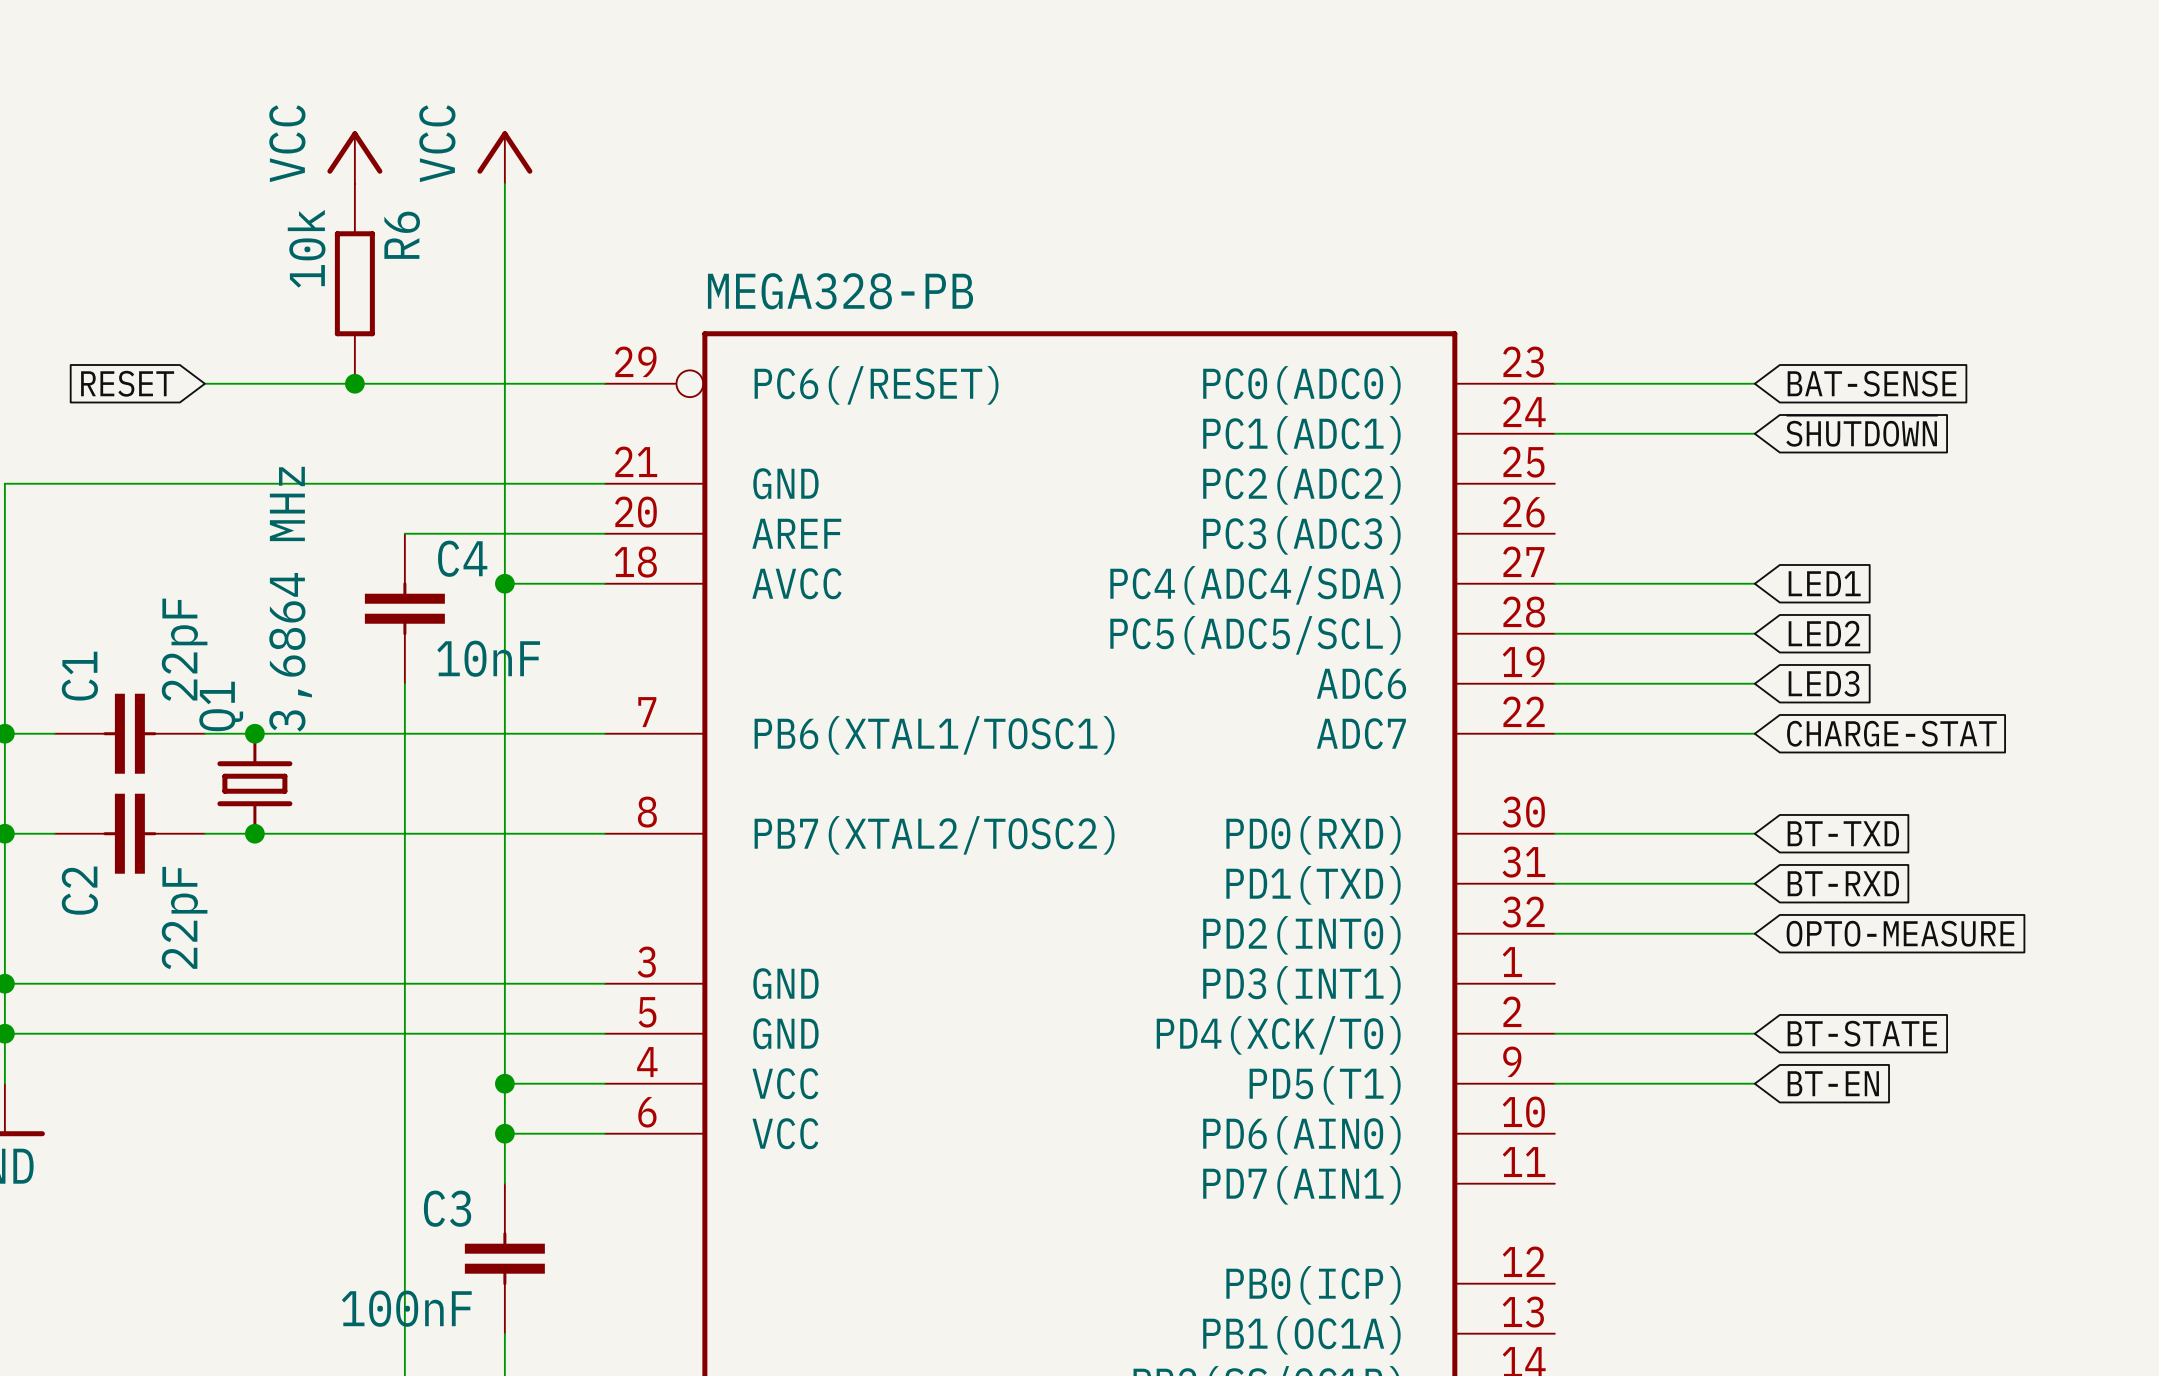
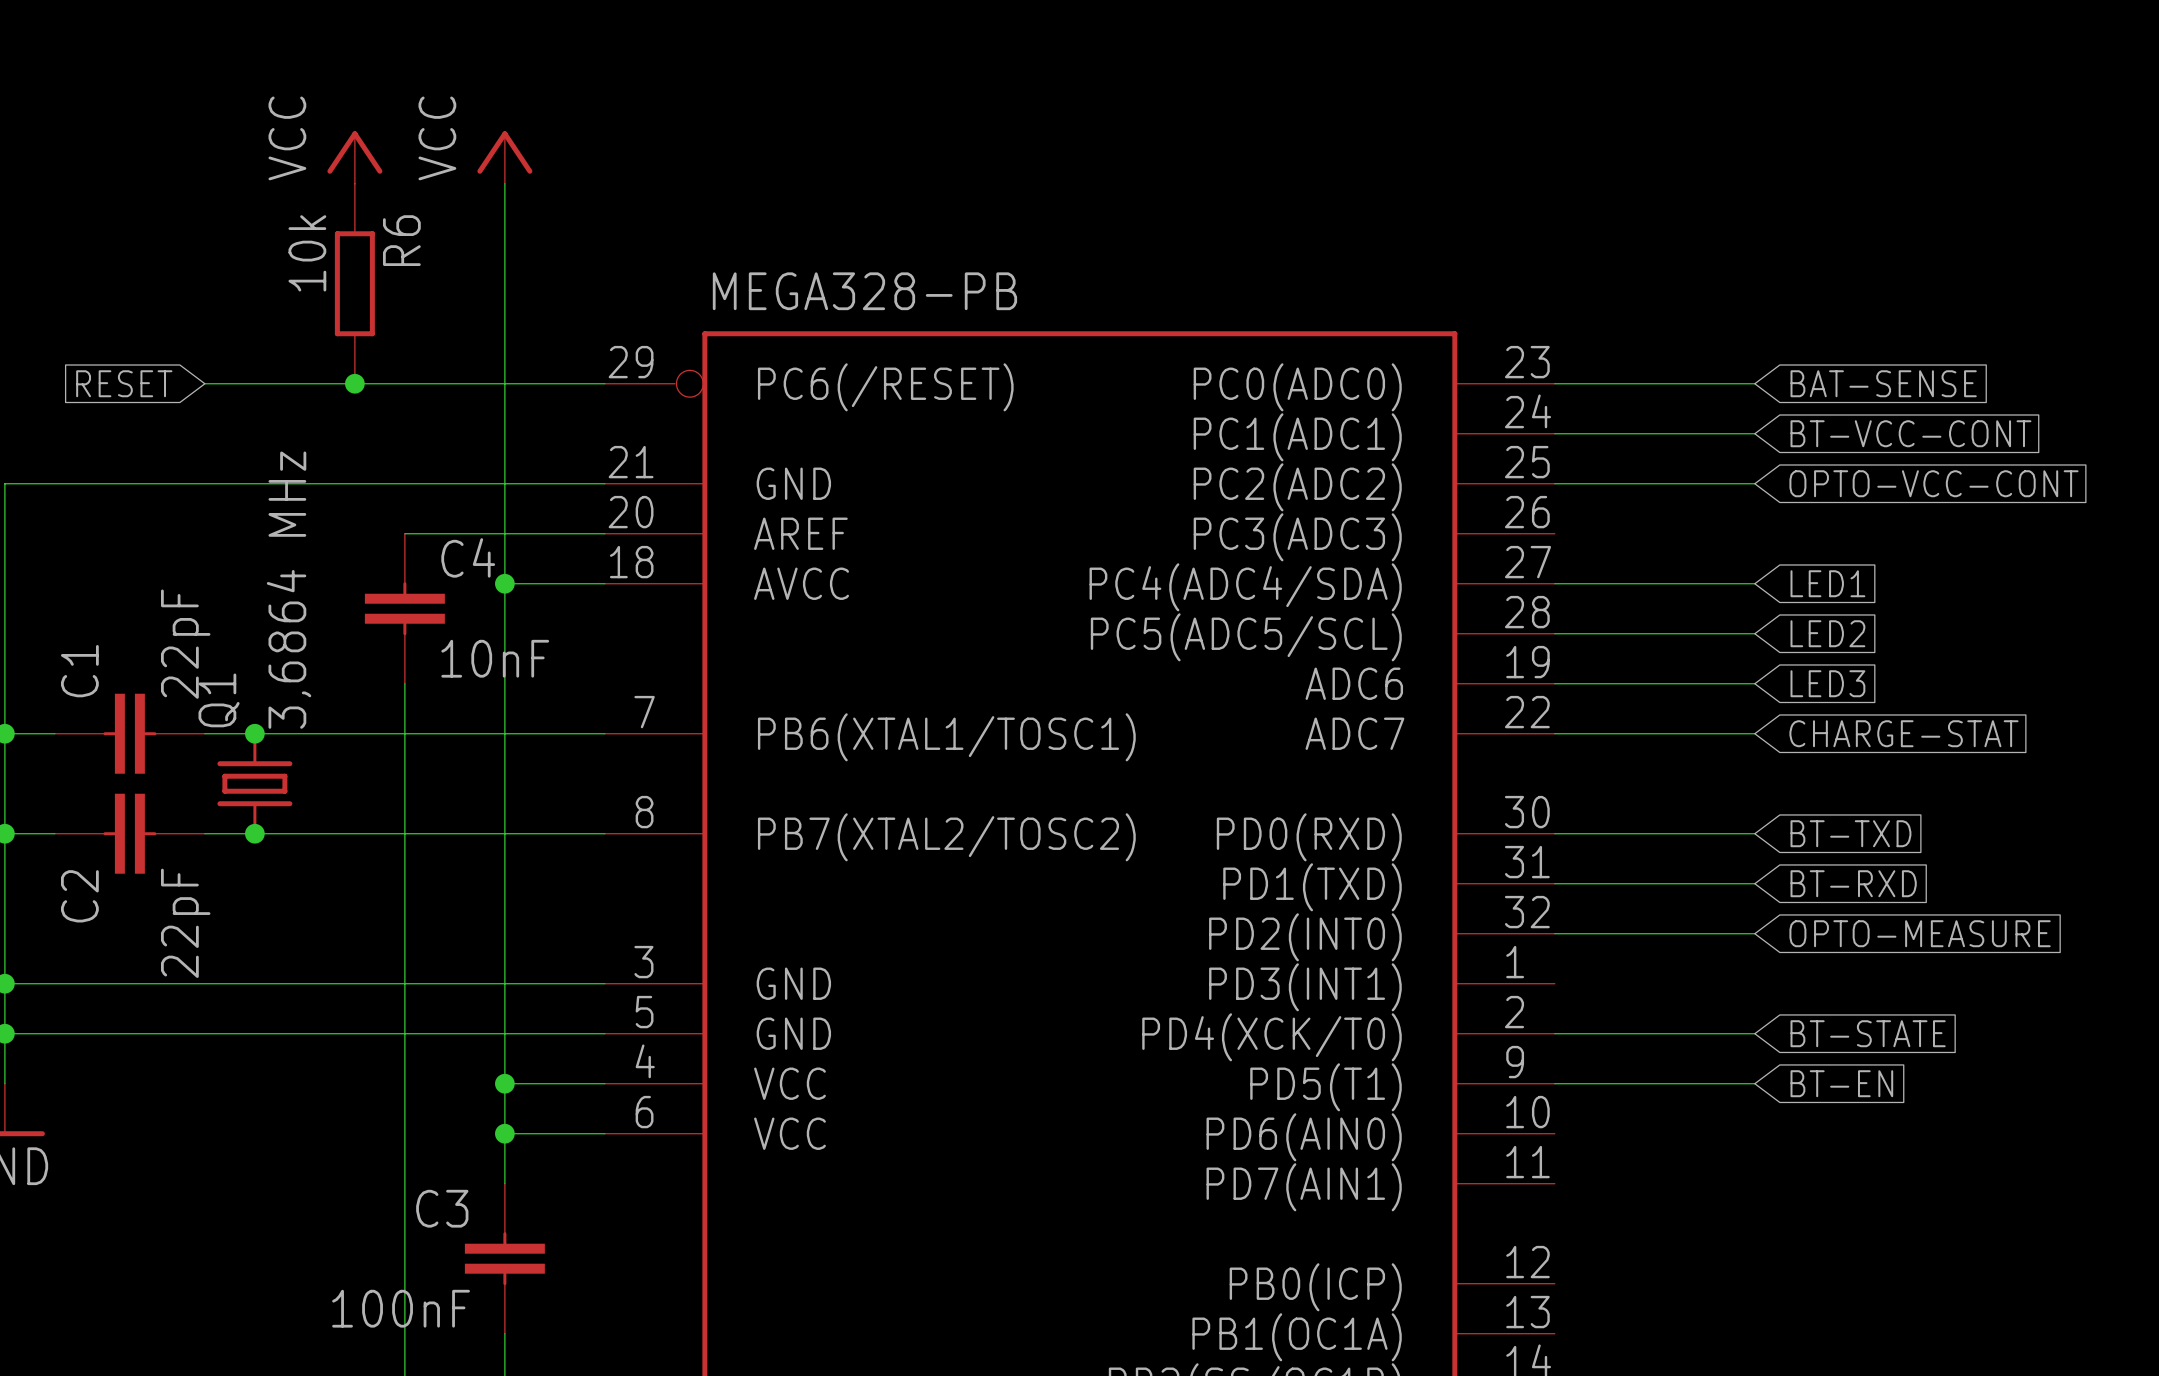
global label: ~{SHUTDOWN} (1861, 431) -> BT-VCC-CONT (1910, 433)
wire: none -> (1554, 483) (1754, 483)
global label: none -> OPTO-VCC-CONT (1933, 483)

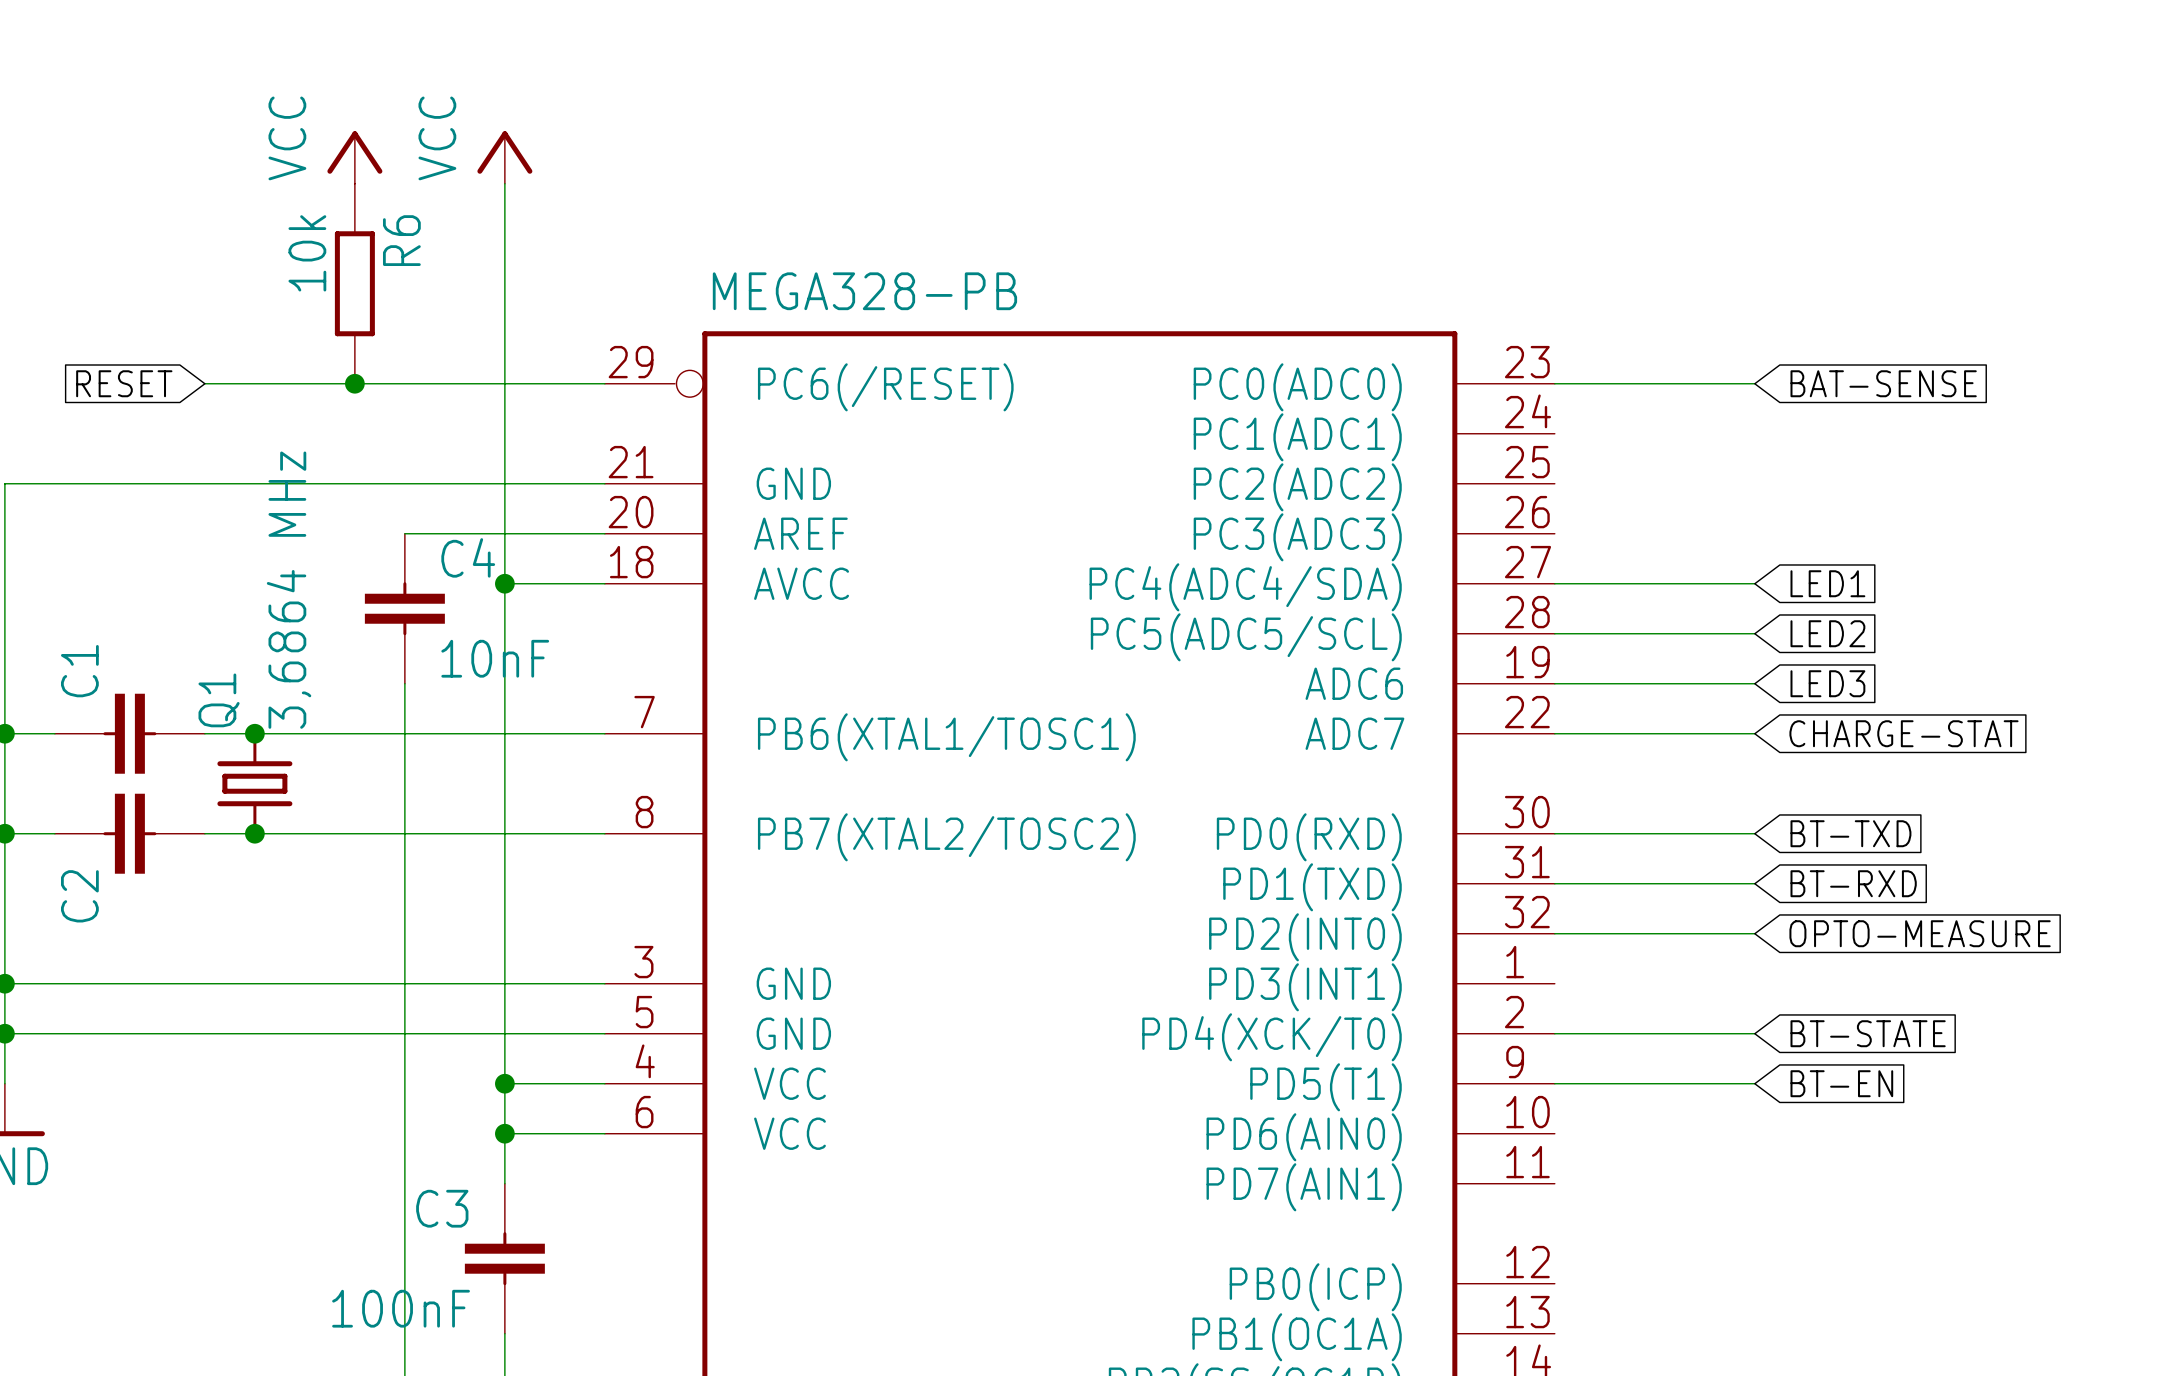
wire: (1554, 433) (1754, 433) -> none
global label: BT-VCC-CONT (1910, 433) -> none
wire: (1554, 483) (1754, 483) -> none
global label: OPTO-VCC-CONT (1933, 483) -> none
C1 value: 22pF (185, 644) -> none
C2 value: 22pF (185, 923) -> none

